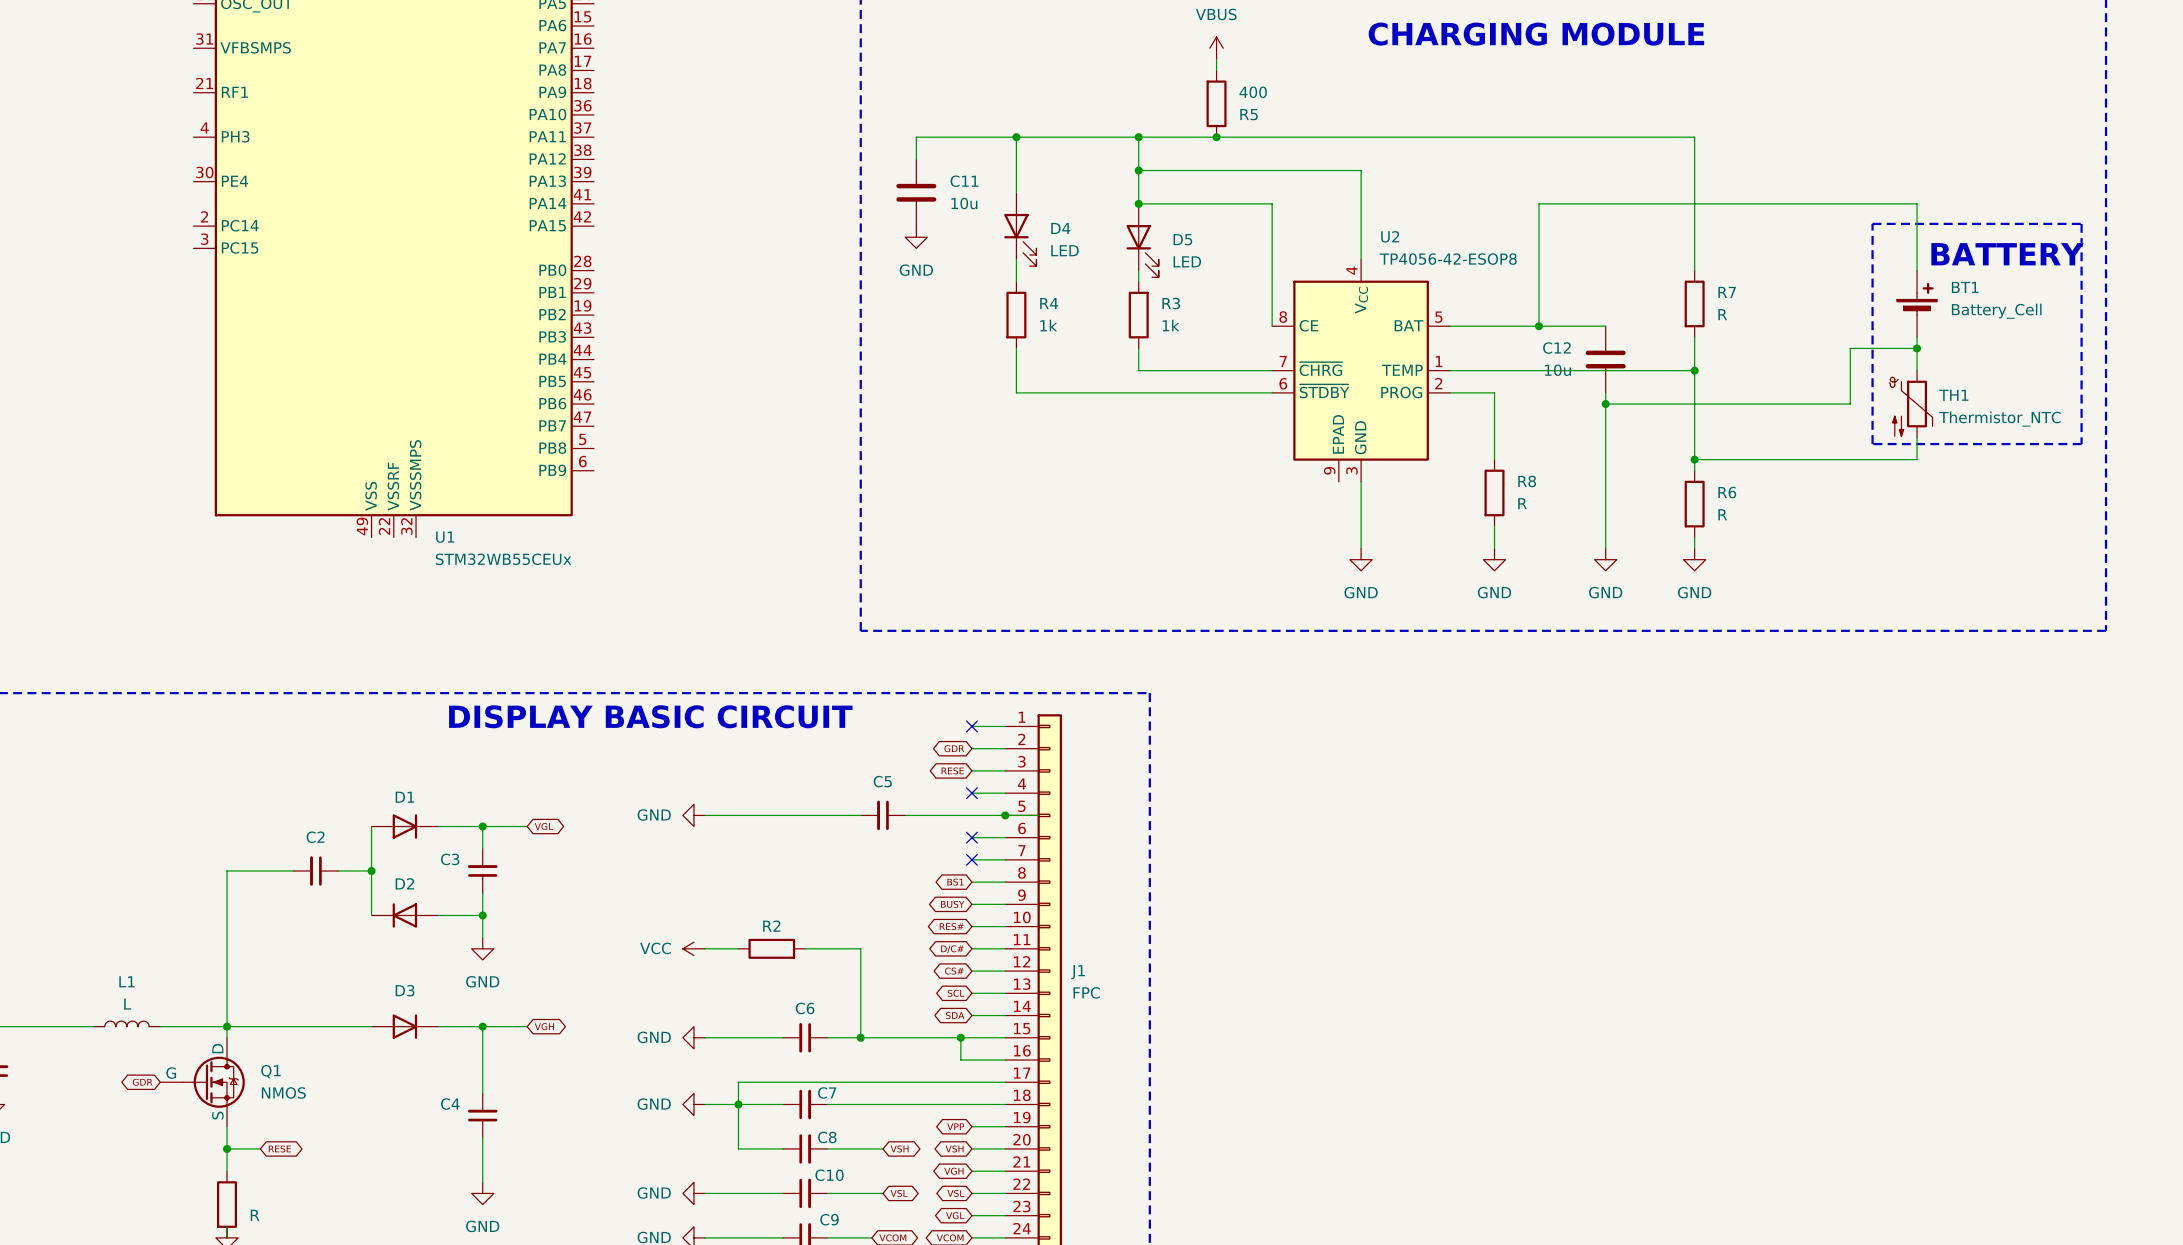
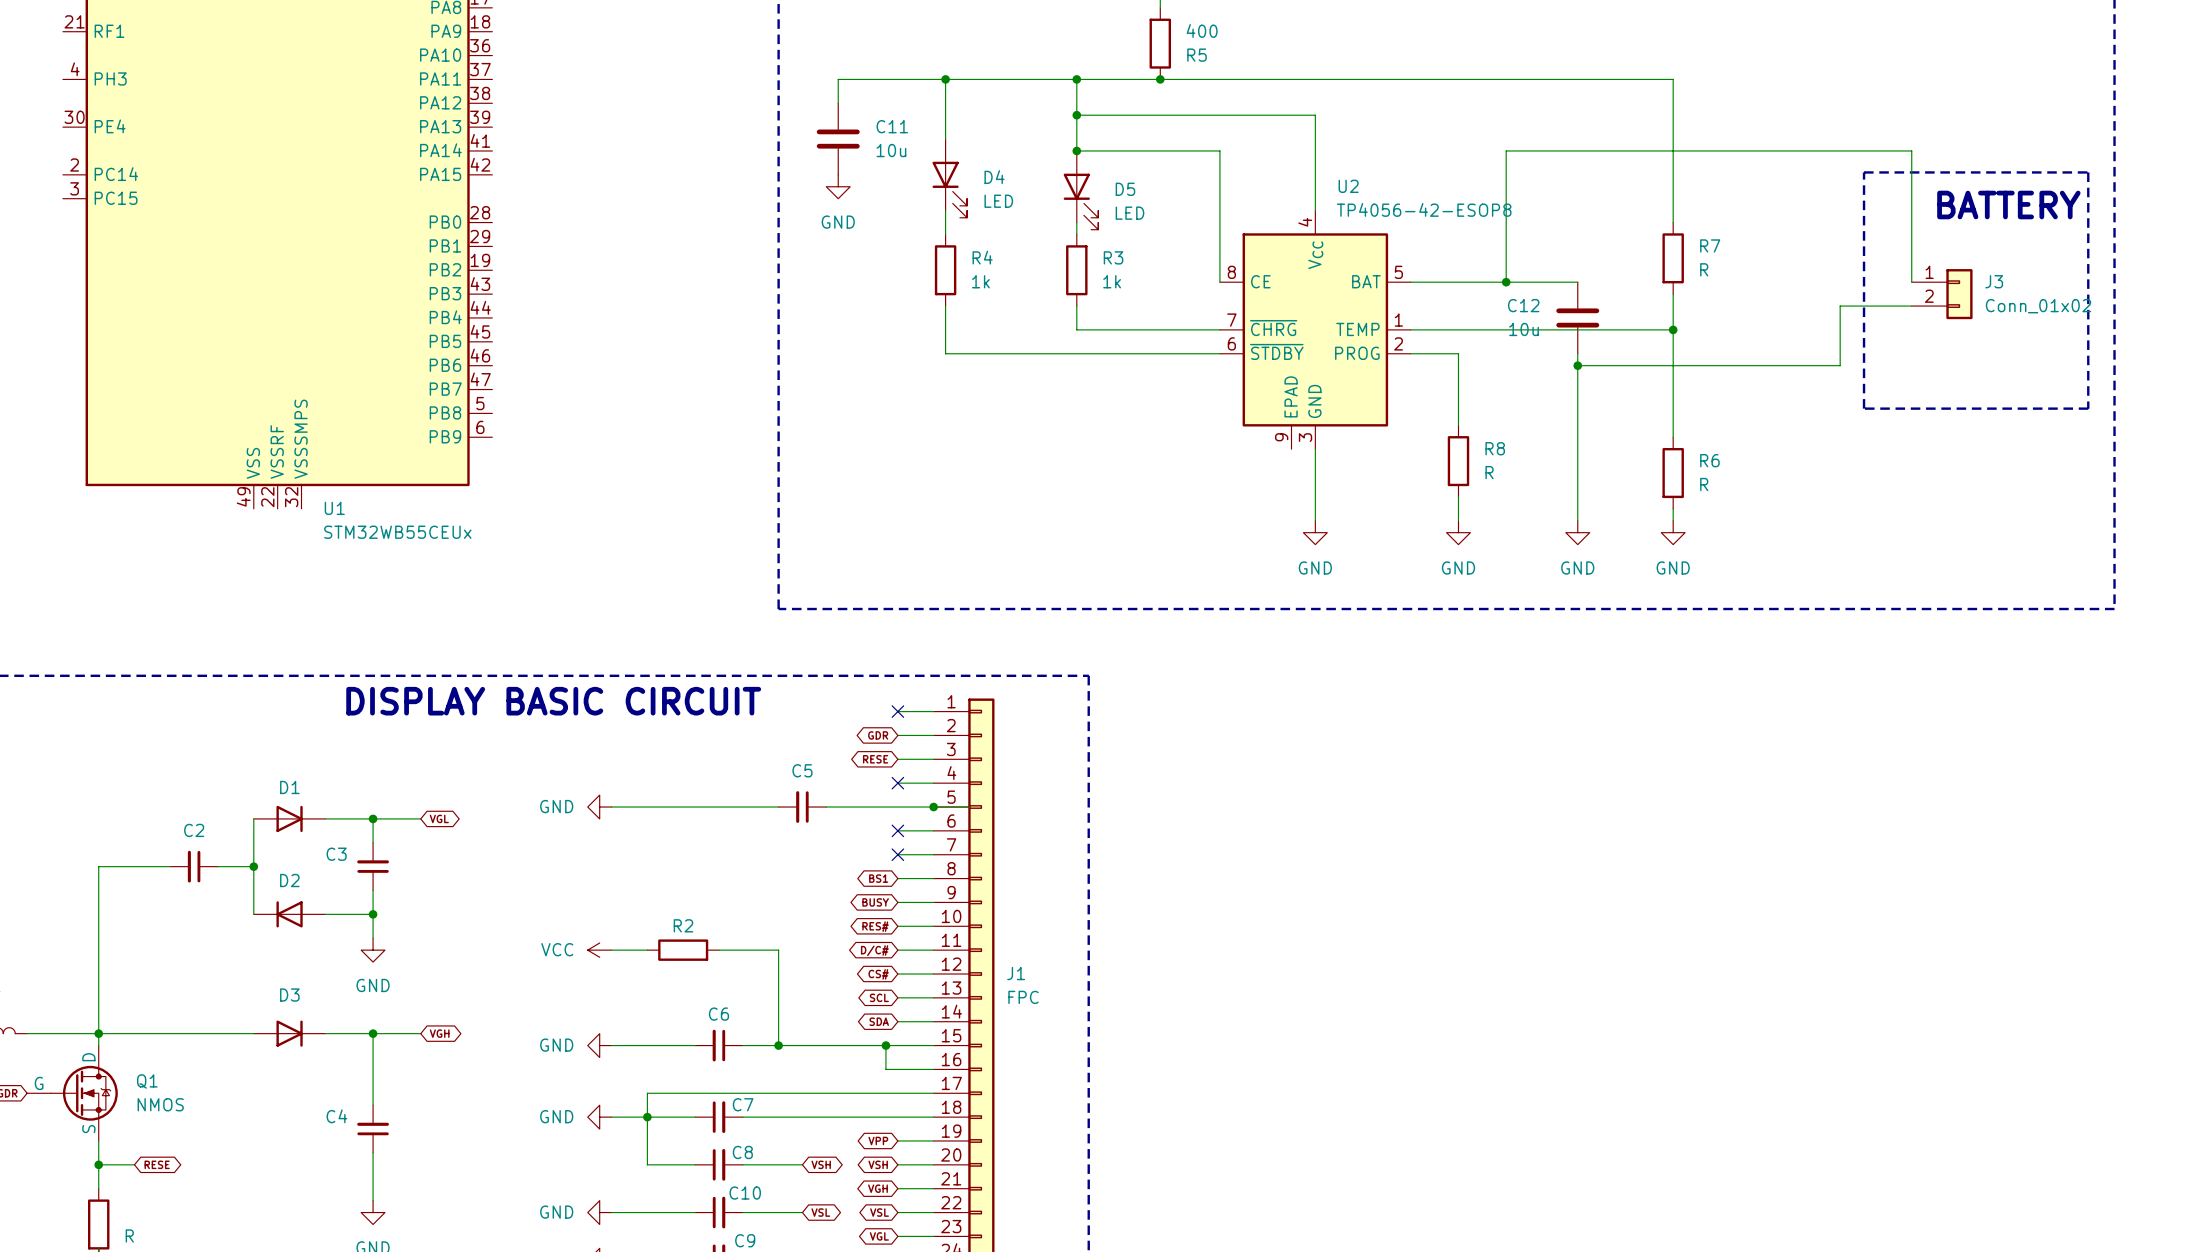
BT1: Battery_Cell (1917, 303) -> none
wire: (1917, 337) (1917, 370) -> none
J3: none -> Conn_01x02 (1942, 294)
junction: (1917, 348) -> none
TH1: Thermistor_NTC (1910, 404) -> none
wire: (1917, 437) (1917, 459) (1694, 459) -> none
junction: (1694, 459) -> none

